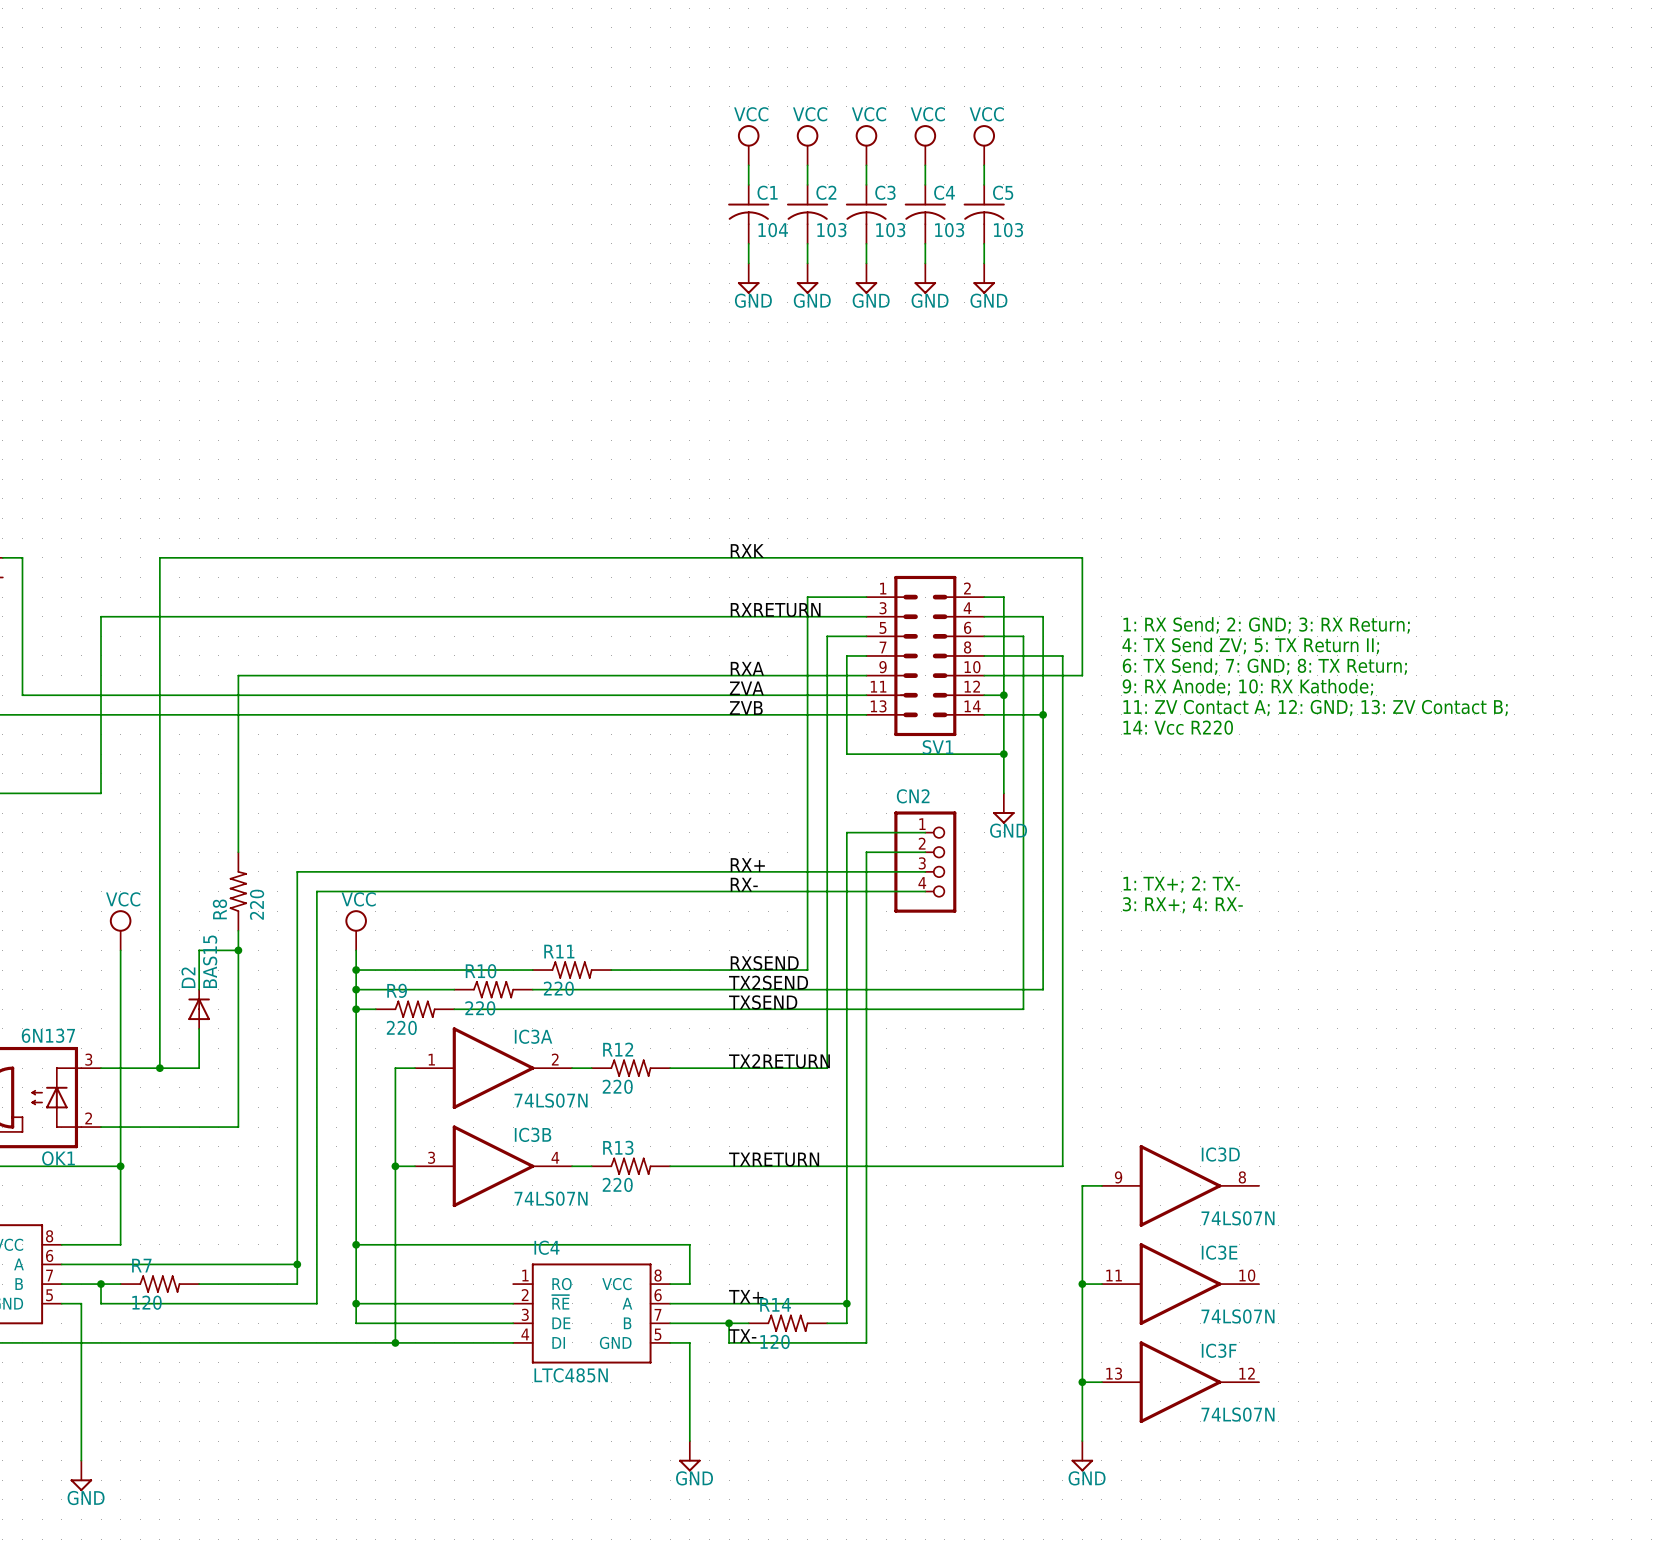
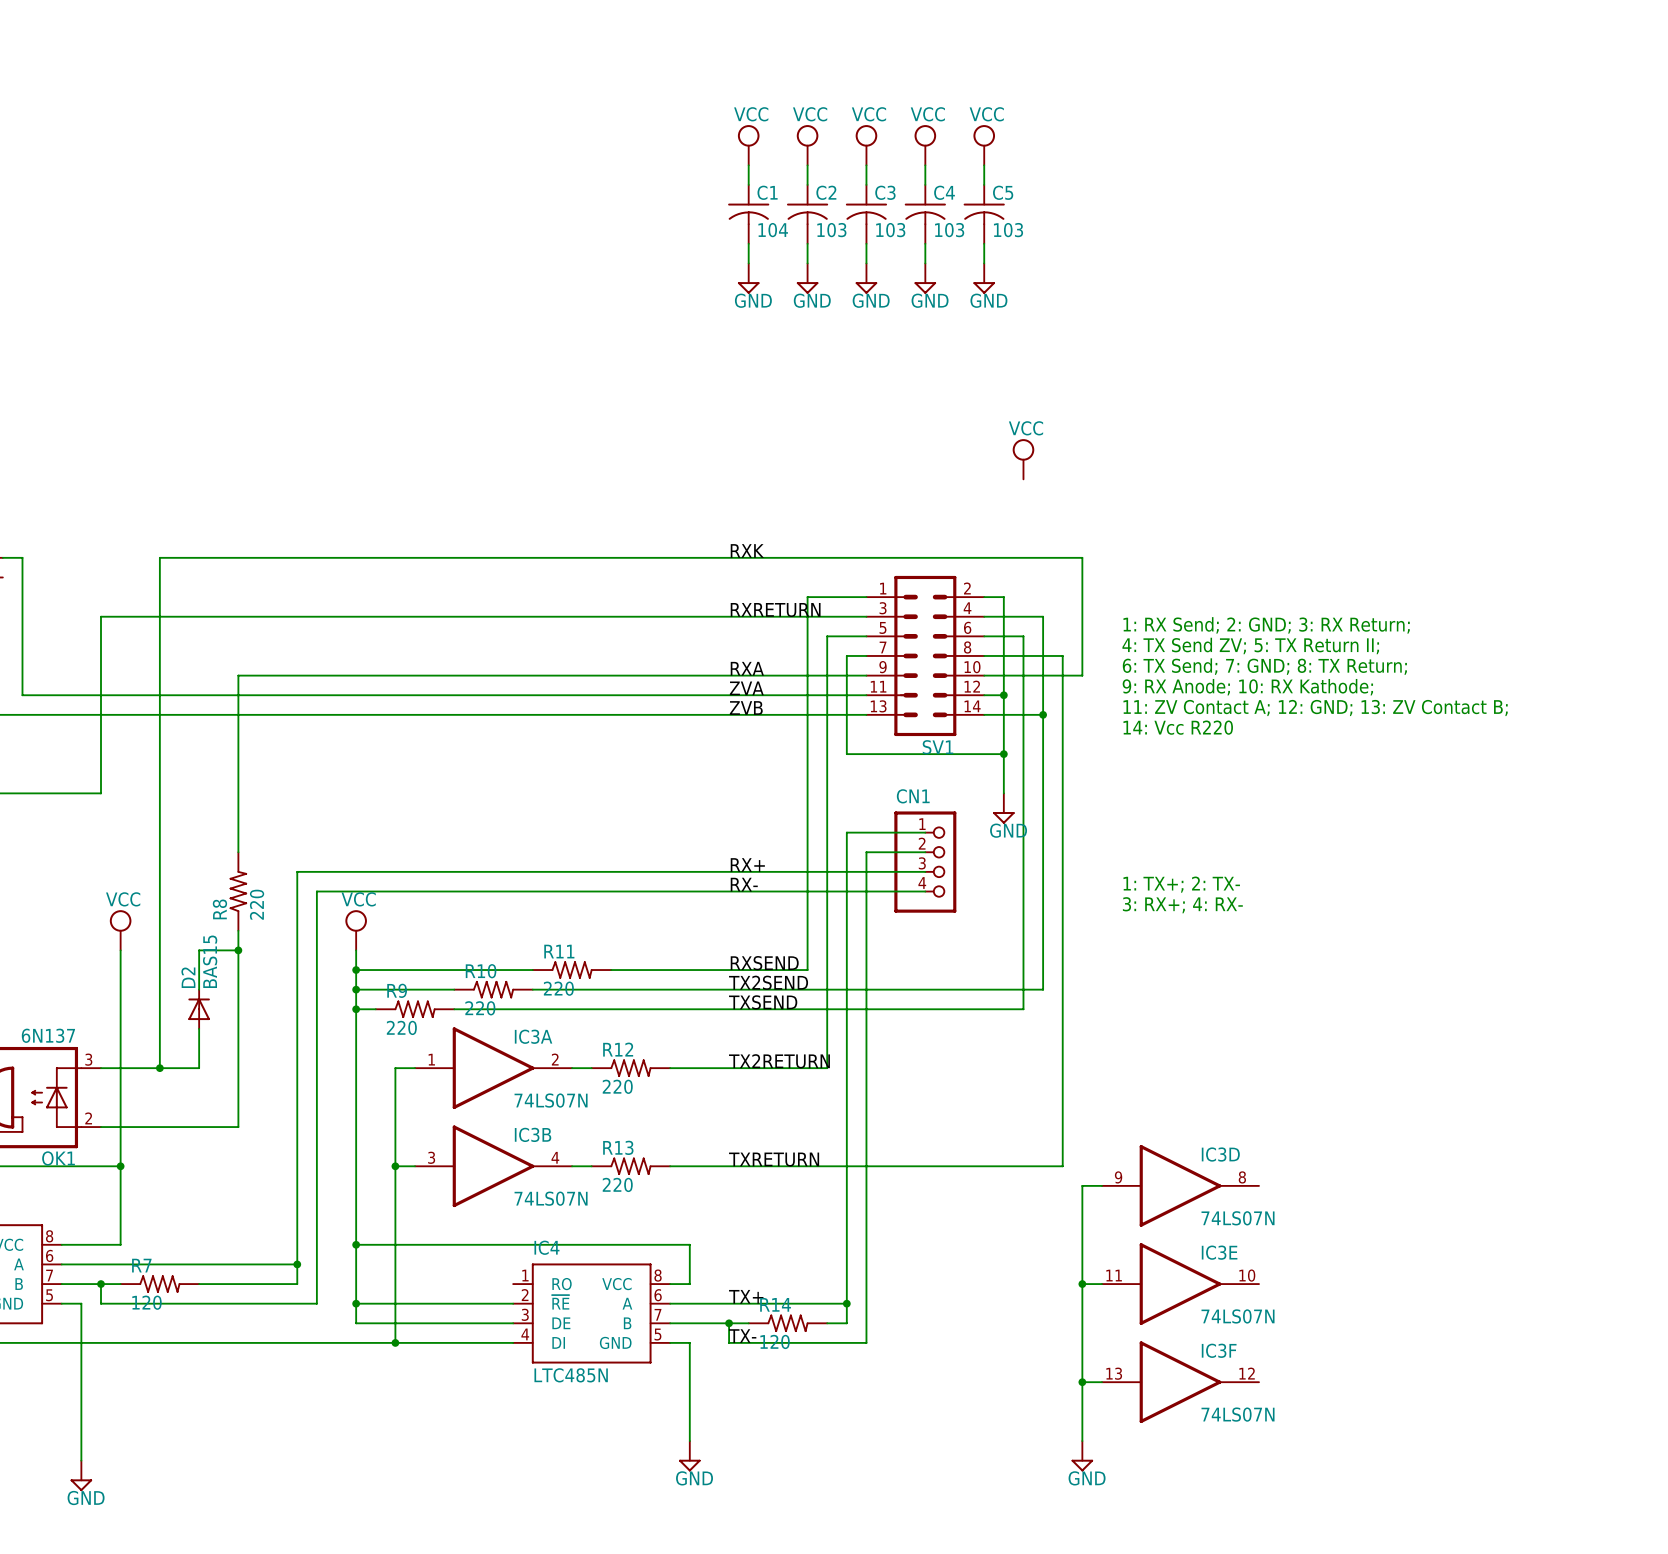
power symbol: none -> VCC (1023, 459)
CN2 name: CN2 (913, 796) -> CN1 (913, 796)

